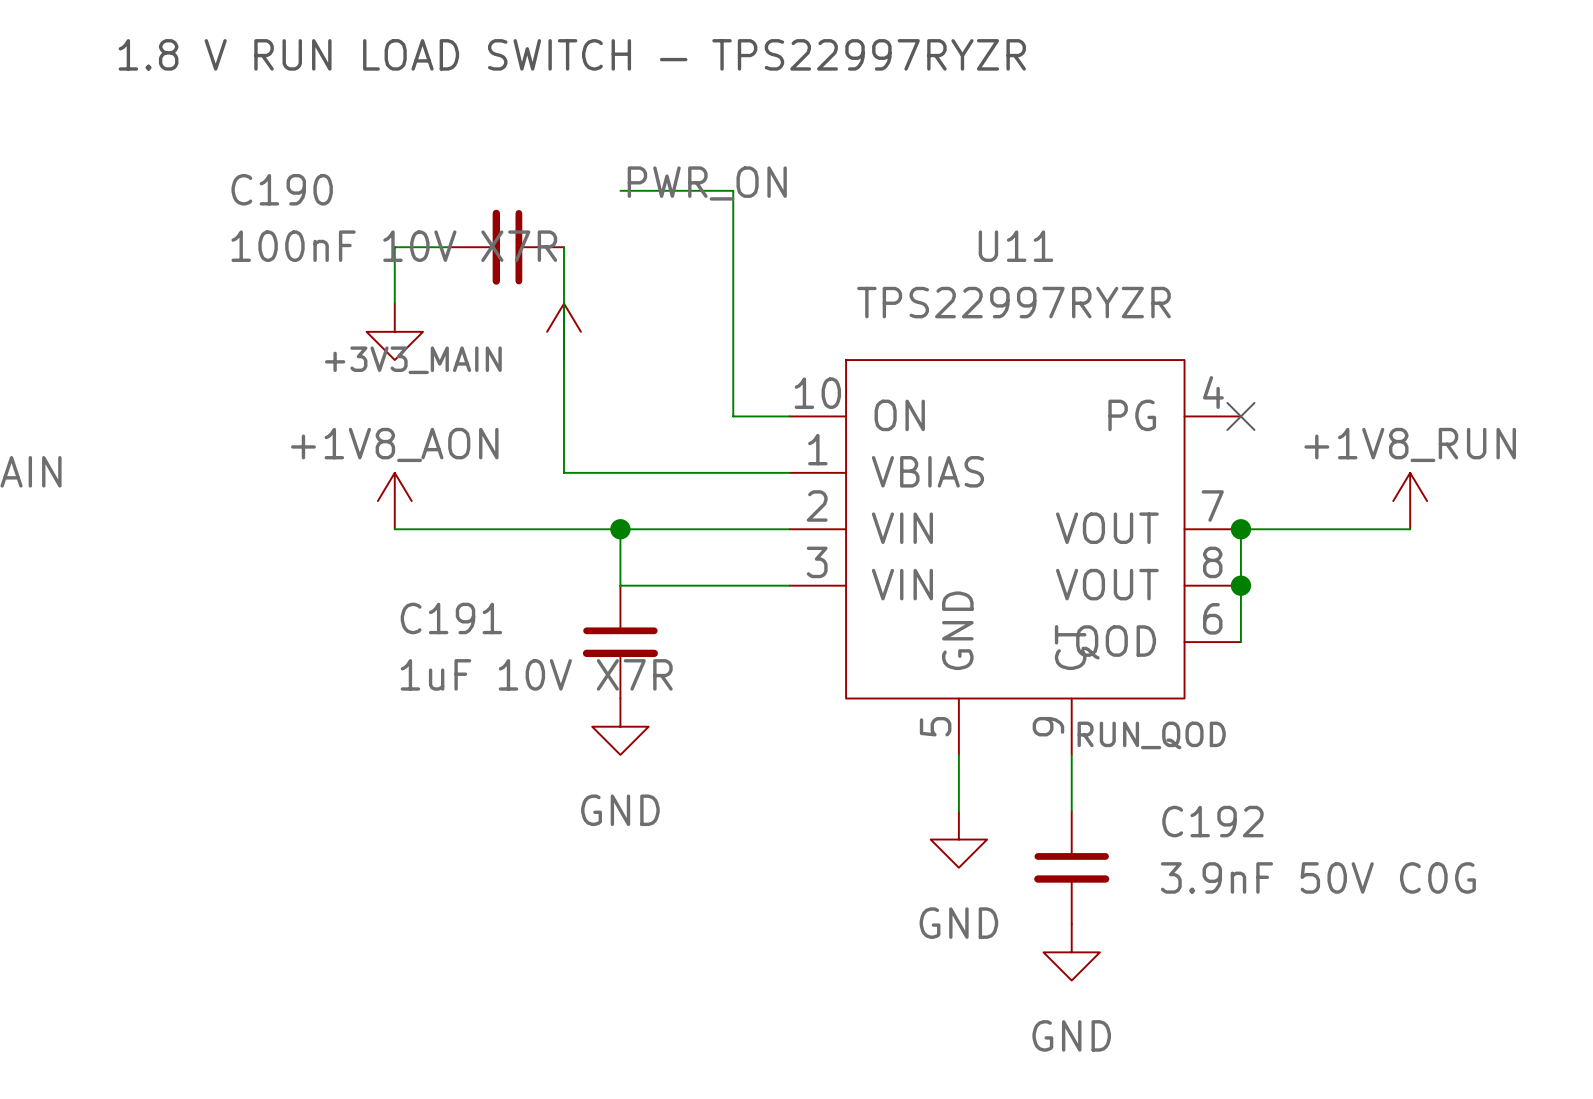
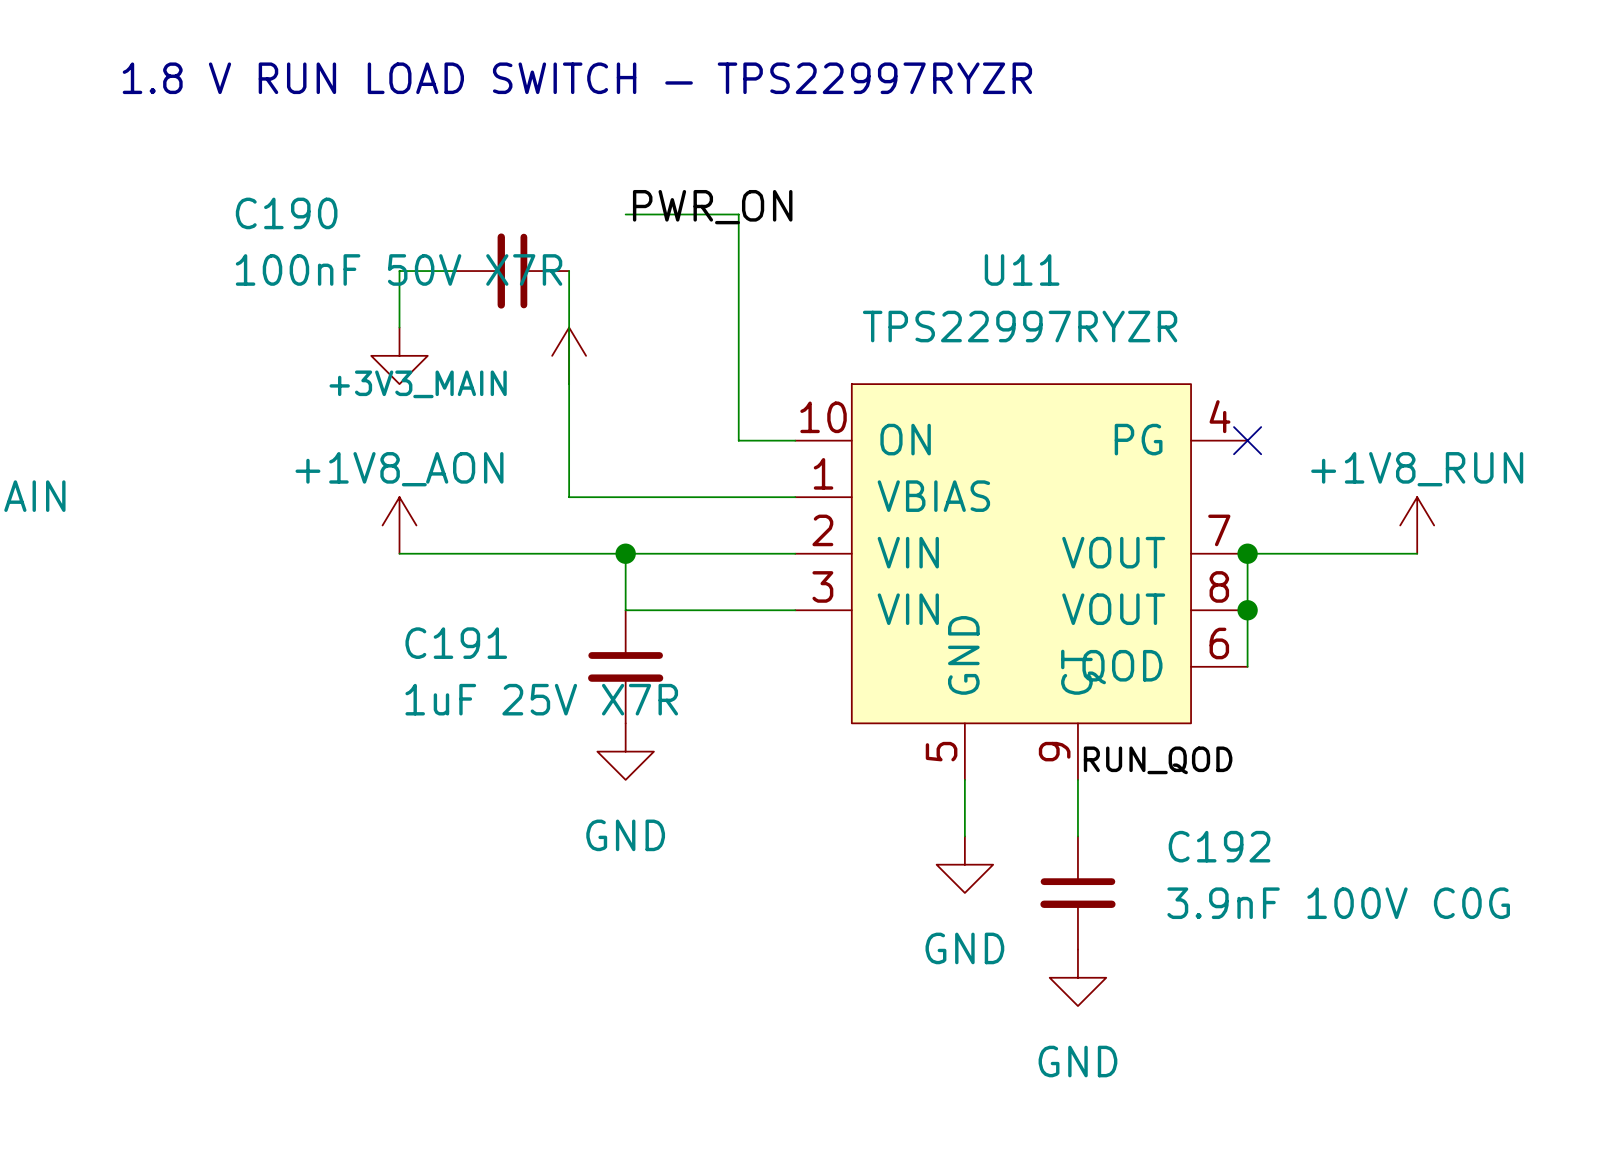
C190 value: 100nF 10V X7R (394, 246) -> 100nF 50V X7R (399, 269)
C191 value: 1uF 10V X7R (536, 674) -> 1uF 25V X7R (541, 699)
C192 value: 3.9nF 50V C0G (1318, 877) -> 3.9nF 100V C0G (1338, 903)

